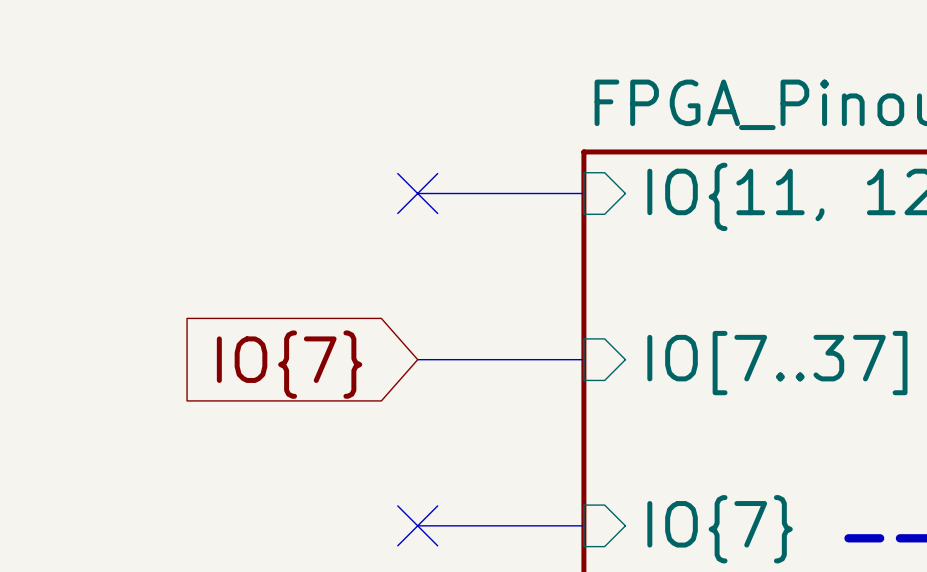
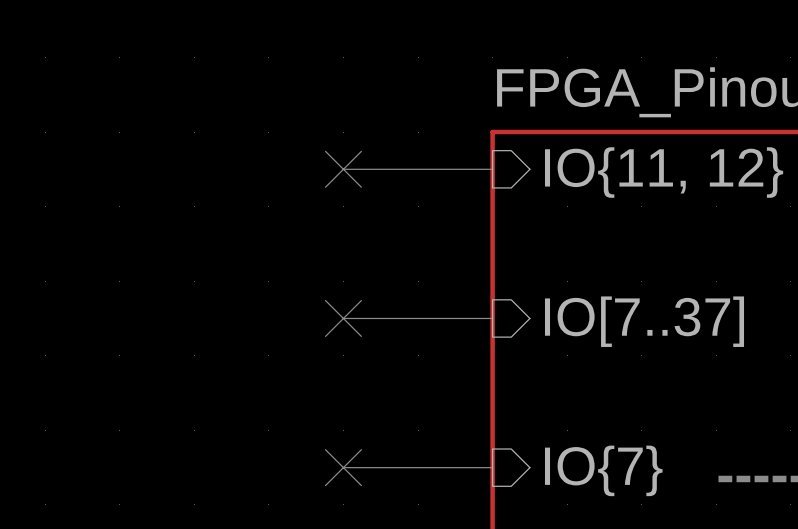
no-connect mark: none -> (343, 318)
global label: IO{7} (289, 364) -> none

